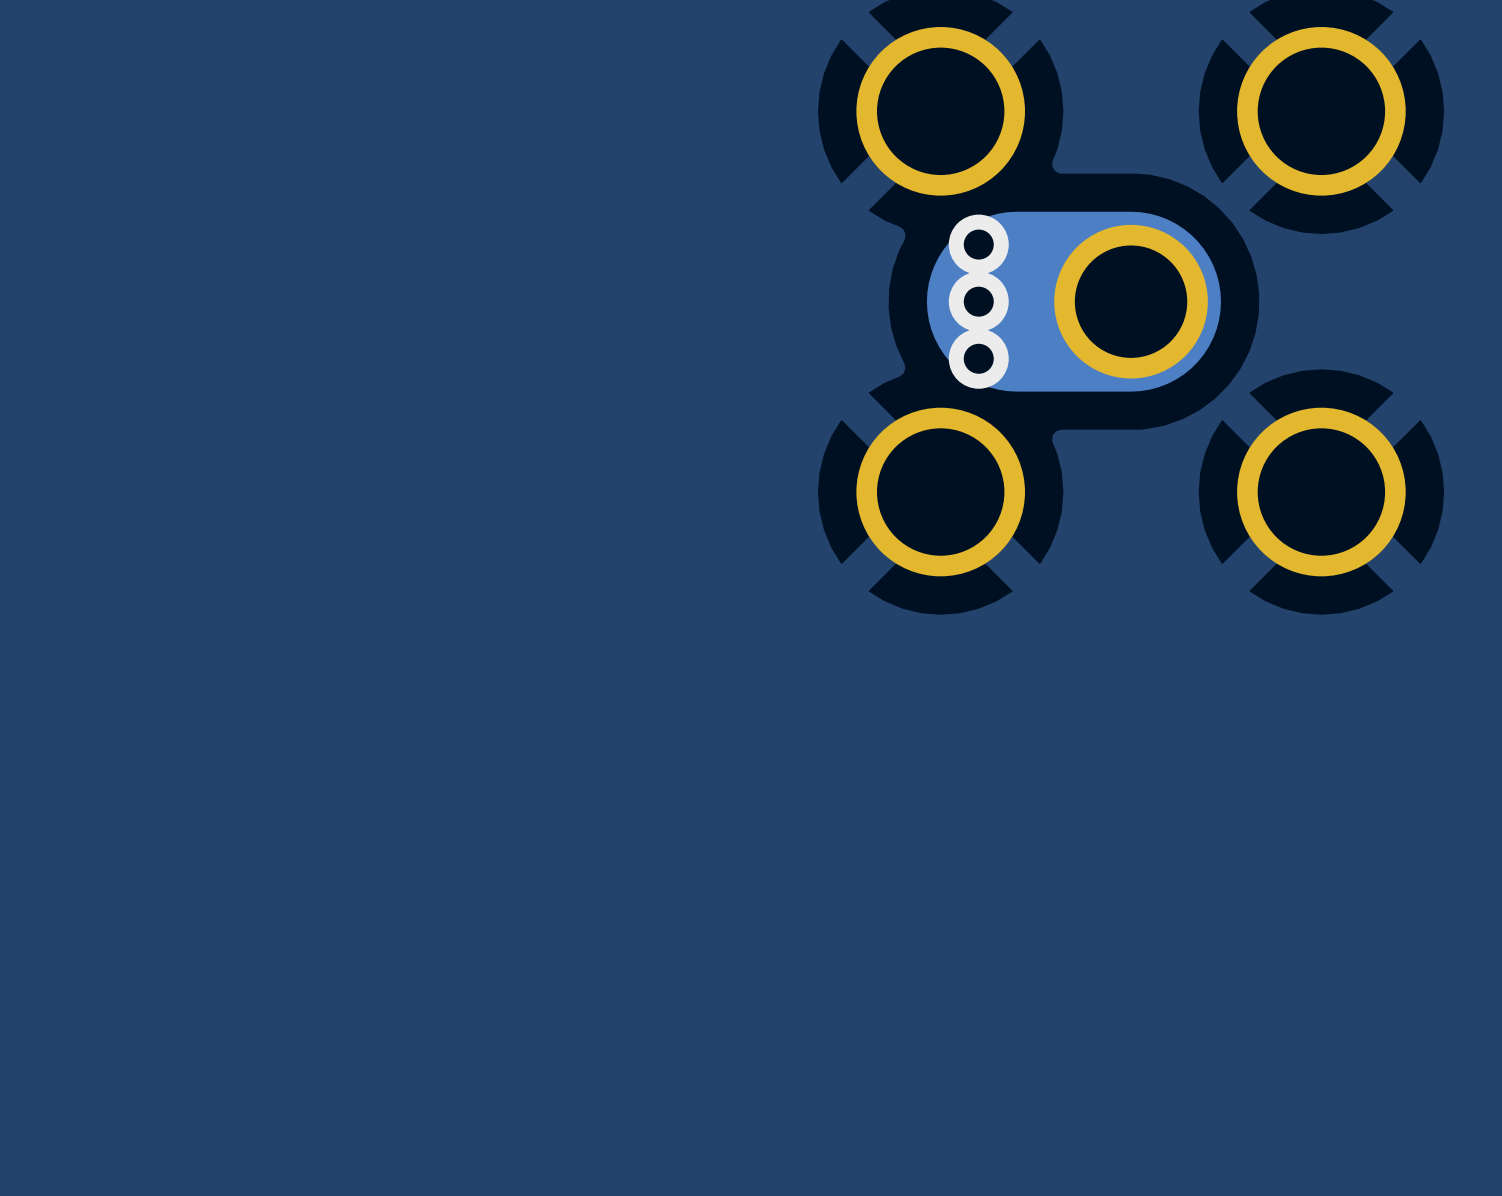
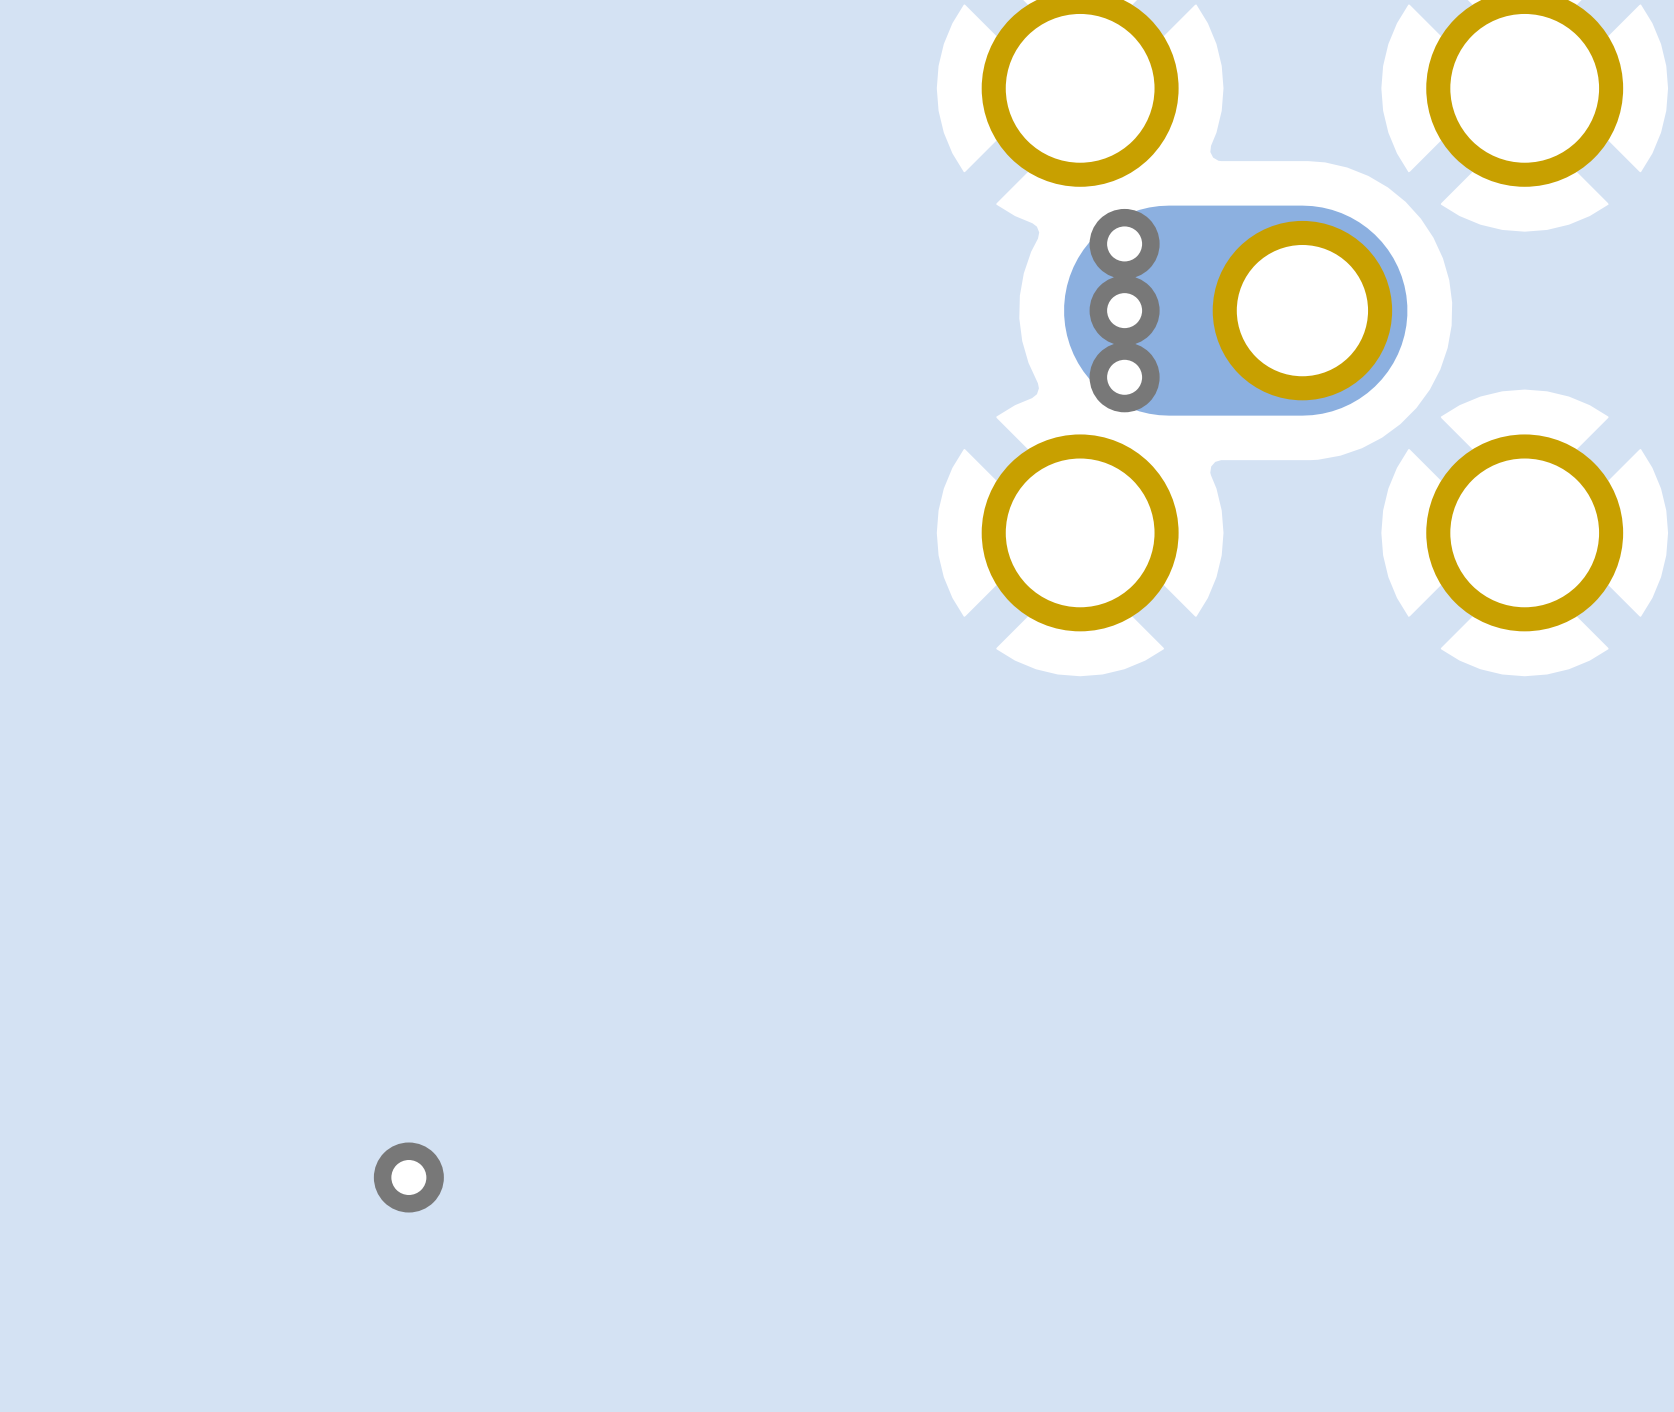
via: none -> (408, 1177)

